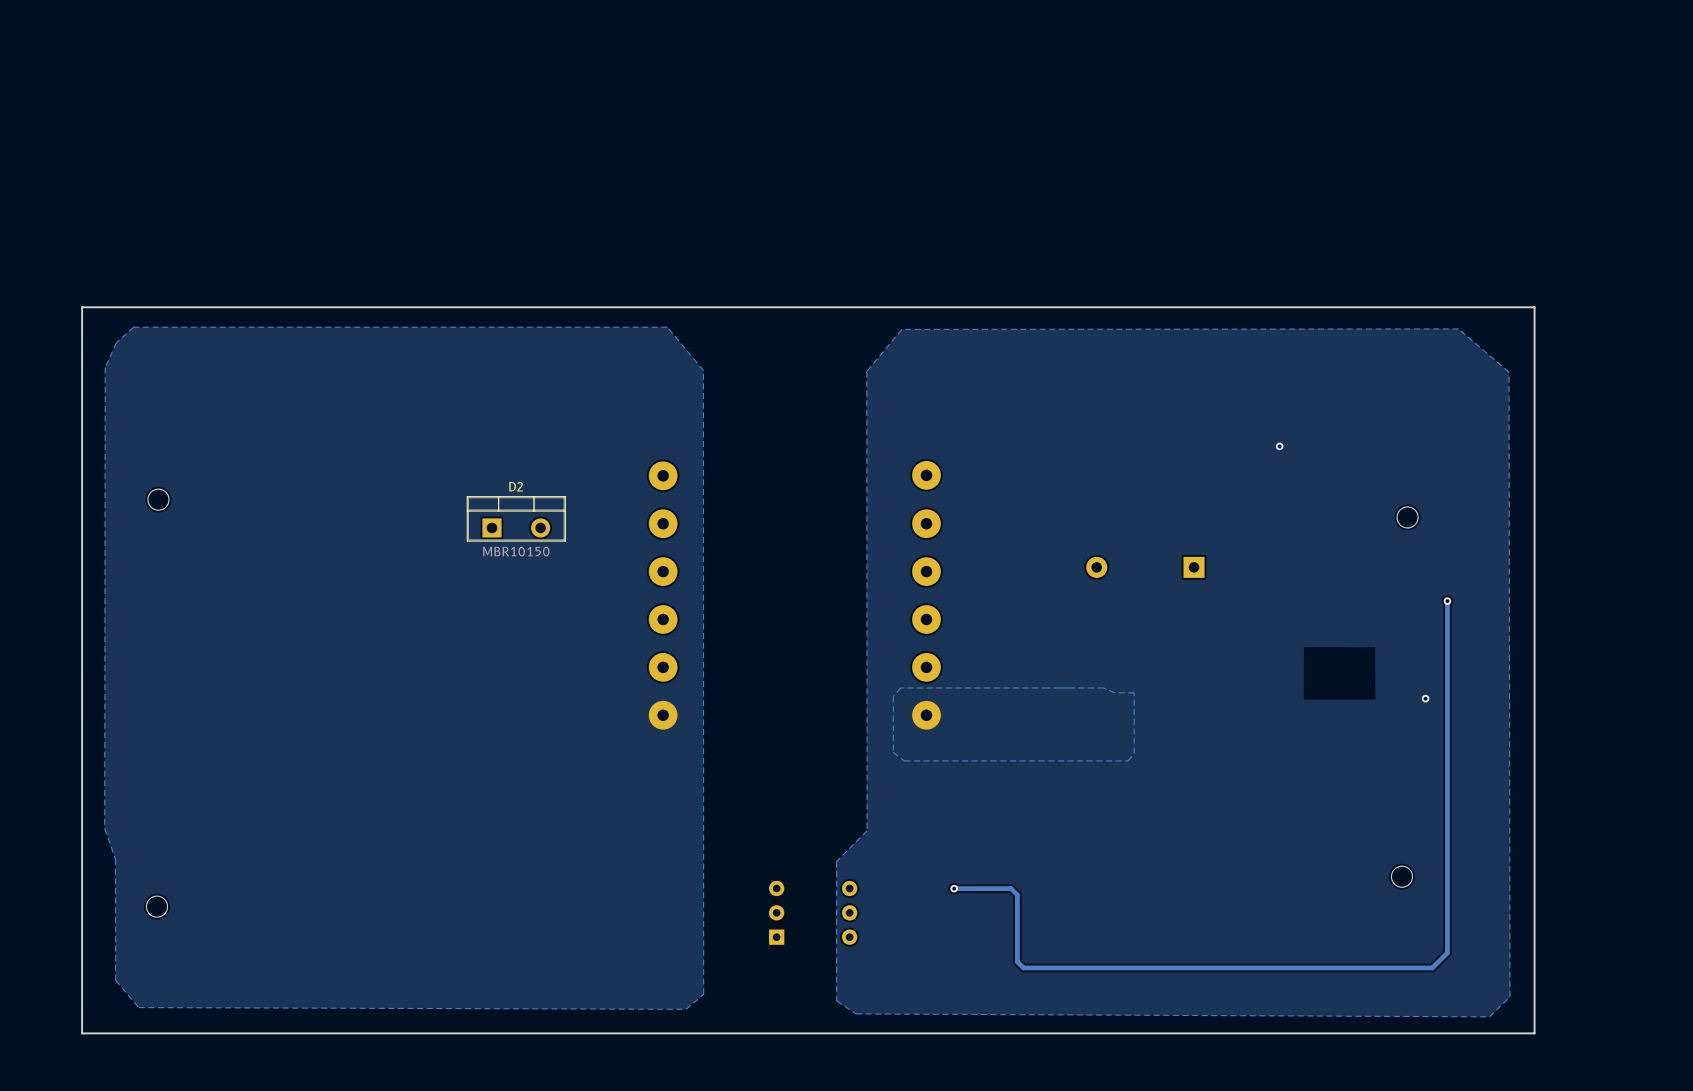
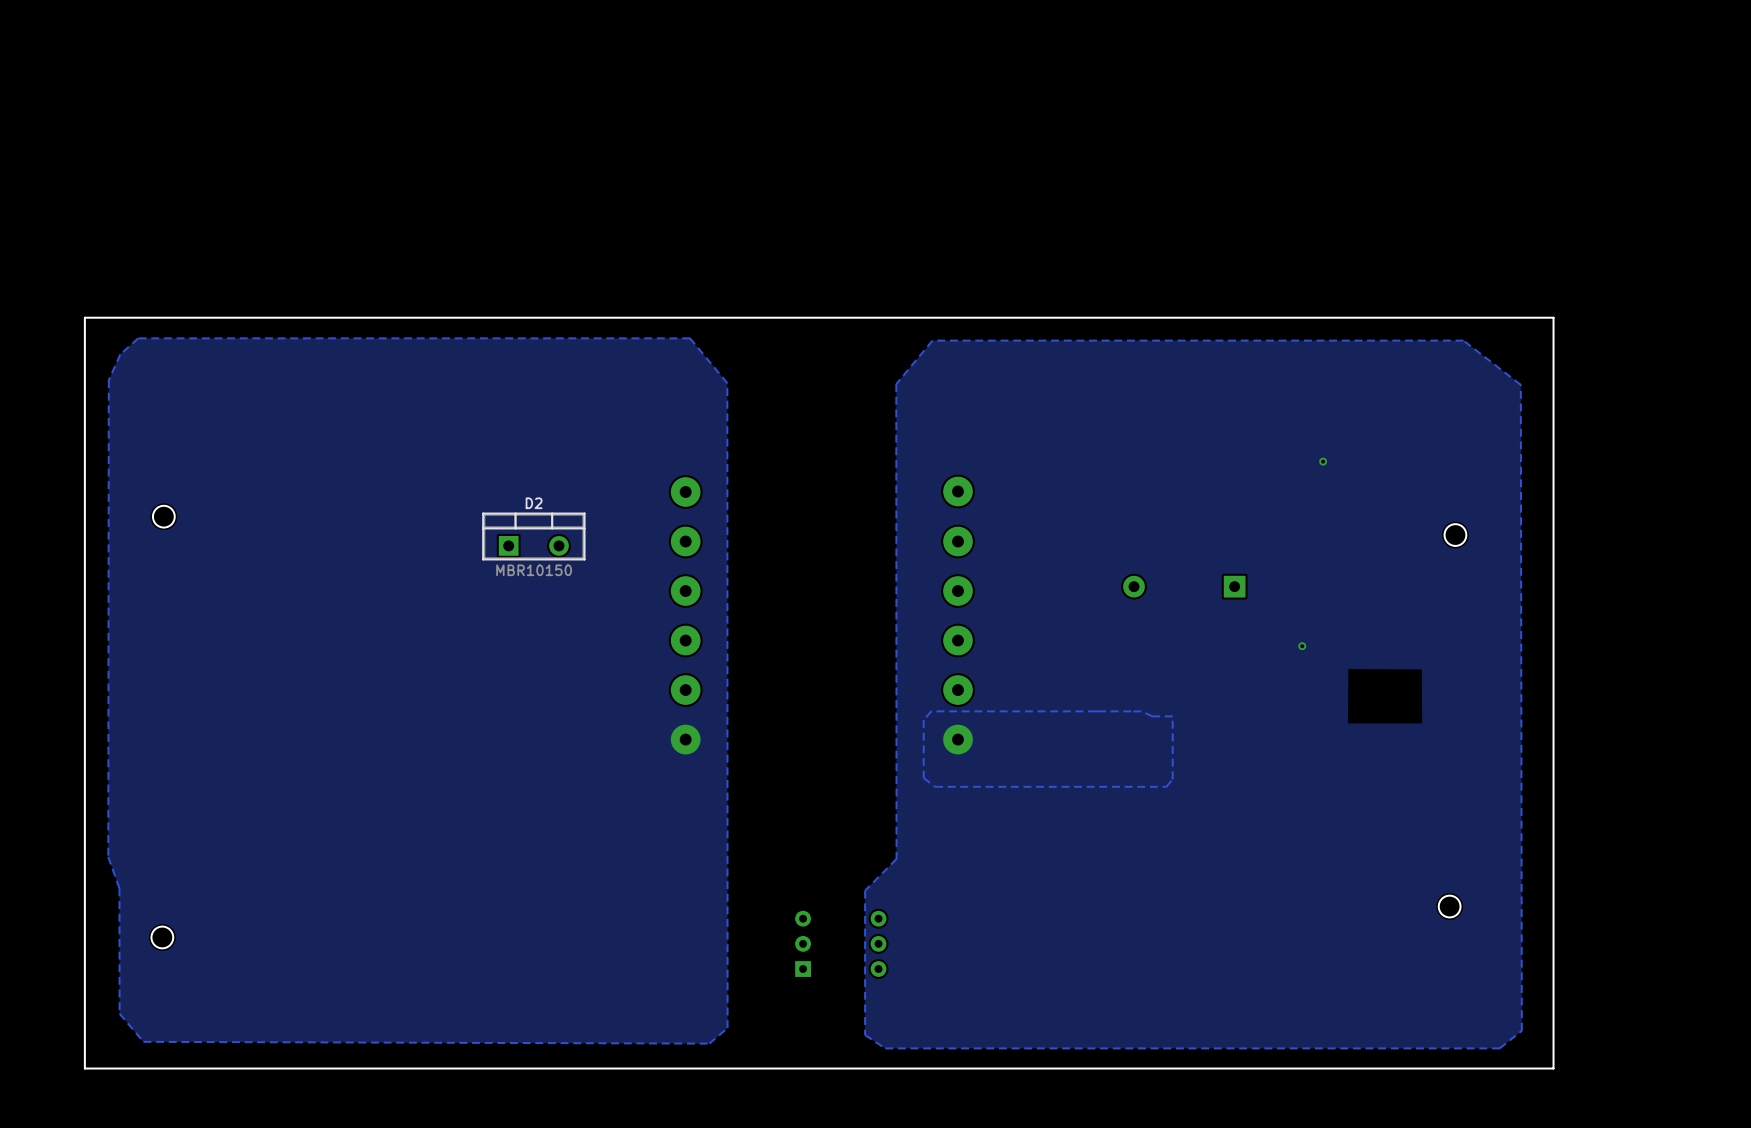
board edge: (1502, 307) (1534, 307) (1534, 1033) (1502, 1033) -> (1553, 317) (1553, 1068)
zone outline: (901, 329) (1458, 328) (1509, 372) (1510, 996) (1489, 1016) (856, 1013) -> (932, 340) (1463, 340) (1520, 384) (1521, 1030) (1499, 1048) (885, 1048)
track: (1447, 601) (1447, 952) (1432, 967) (1023, 967) (1017, 961) (1017, 894) (1011, 888) (954, 888) -> none
via: (1447, 601) -> none
via: none -> (1302, 646)
via: (1425, 698) -> none
via: (954, 888) -> none

